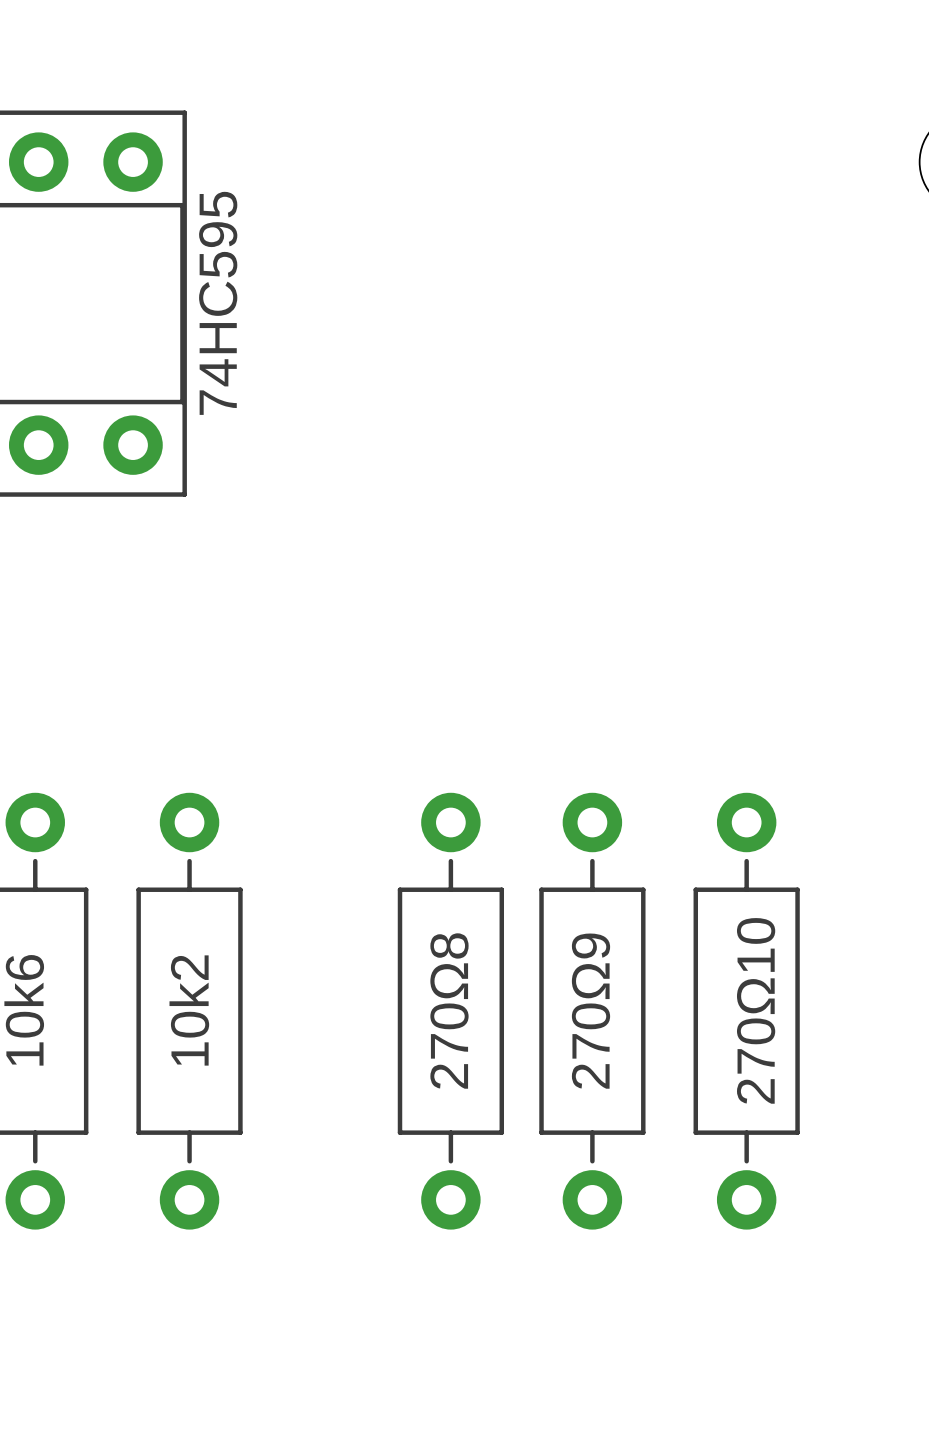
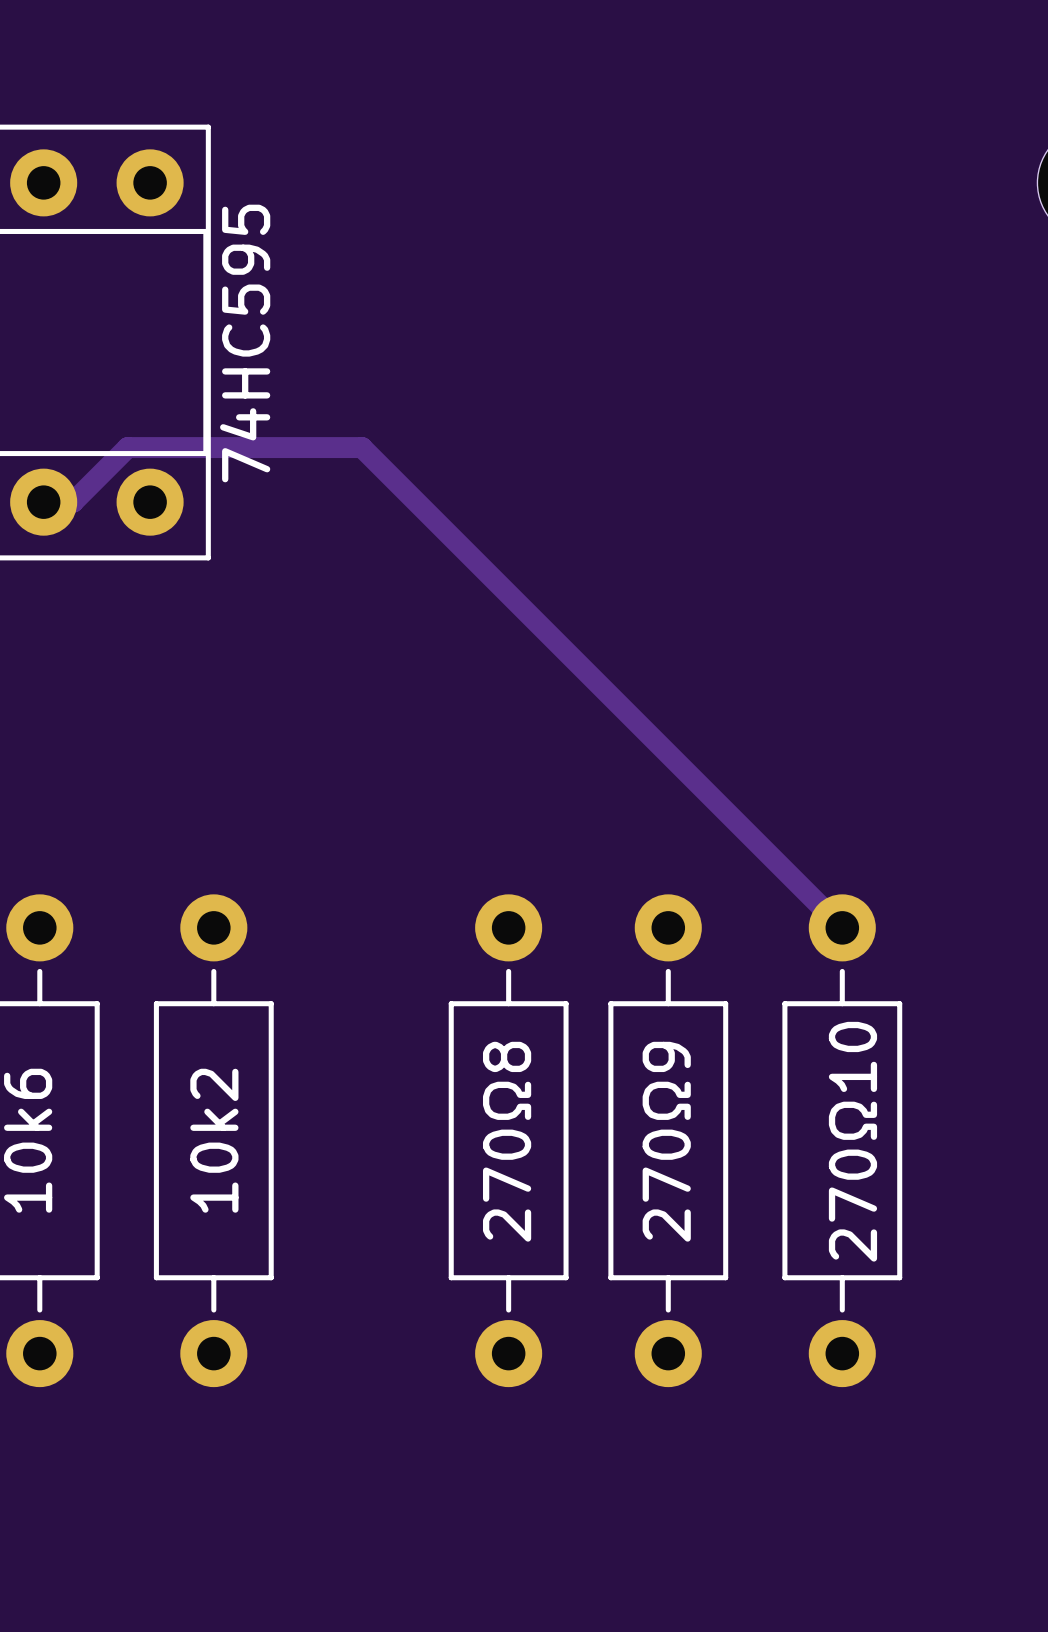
track: none -> (43, 502) (73, 502) (127, 447) (362, 447) (842, 927)

